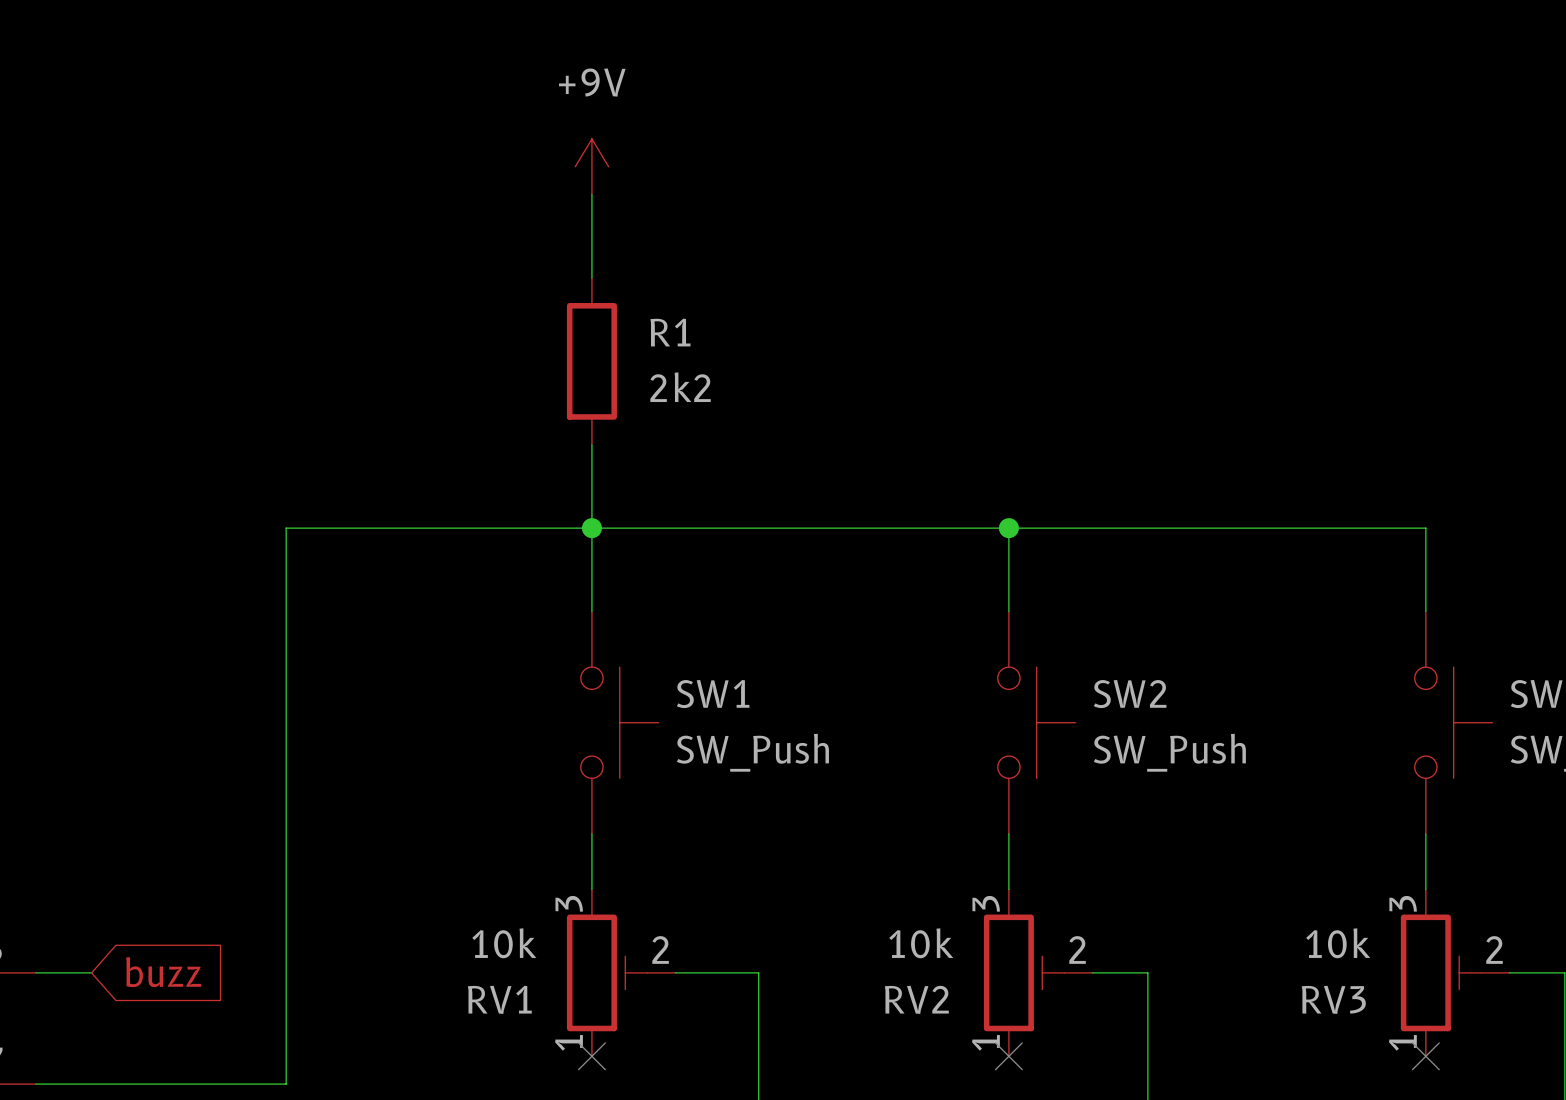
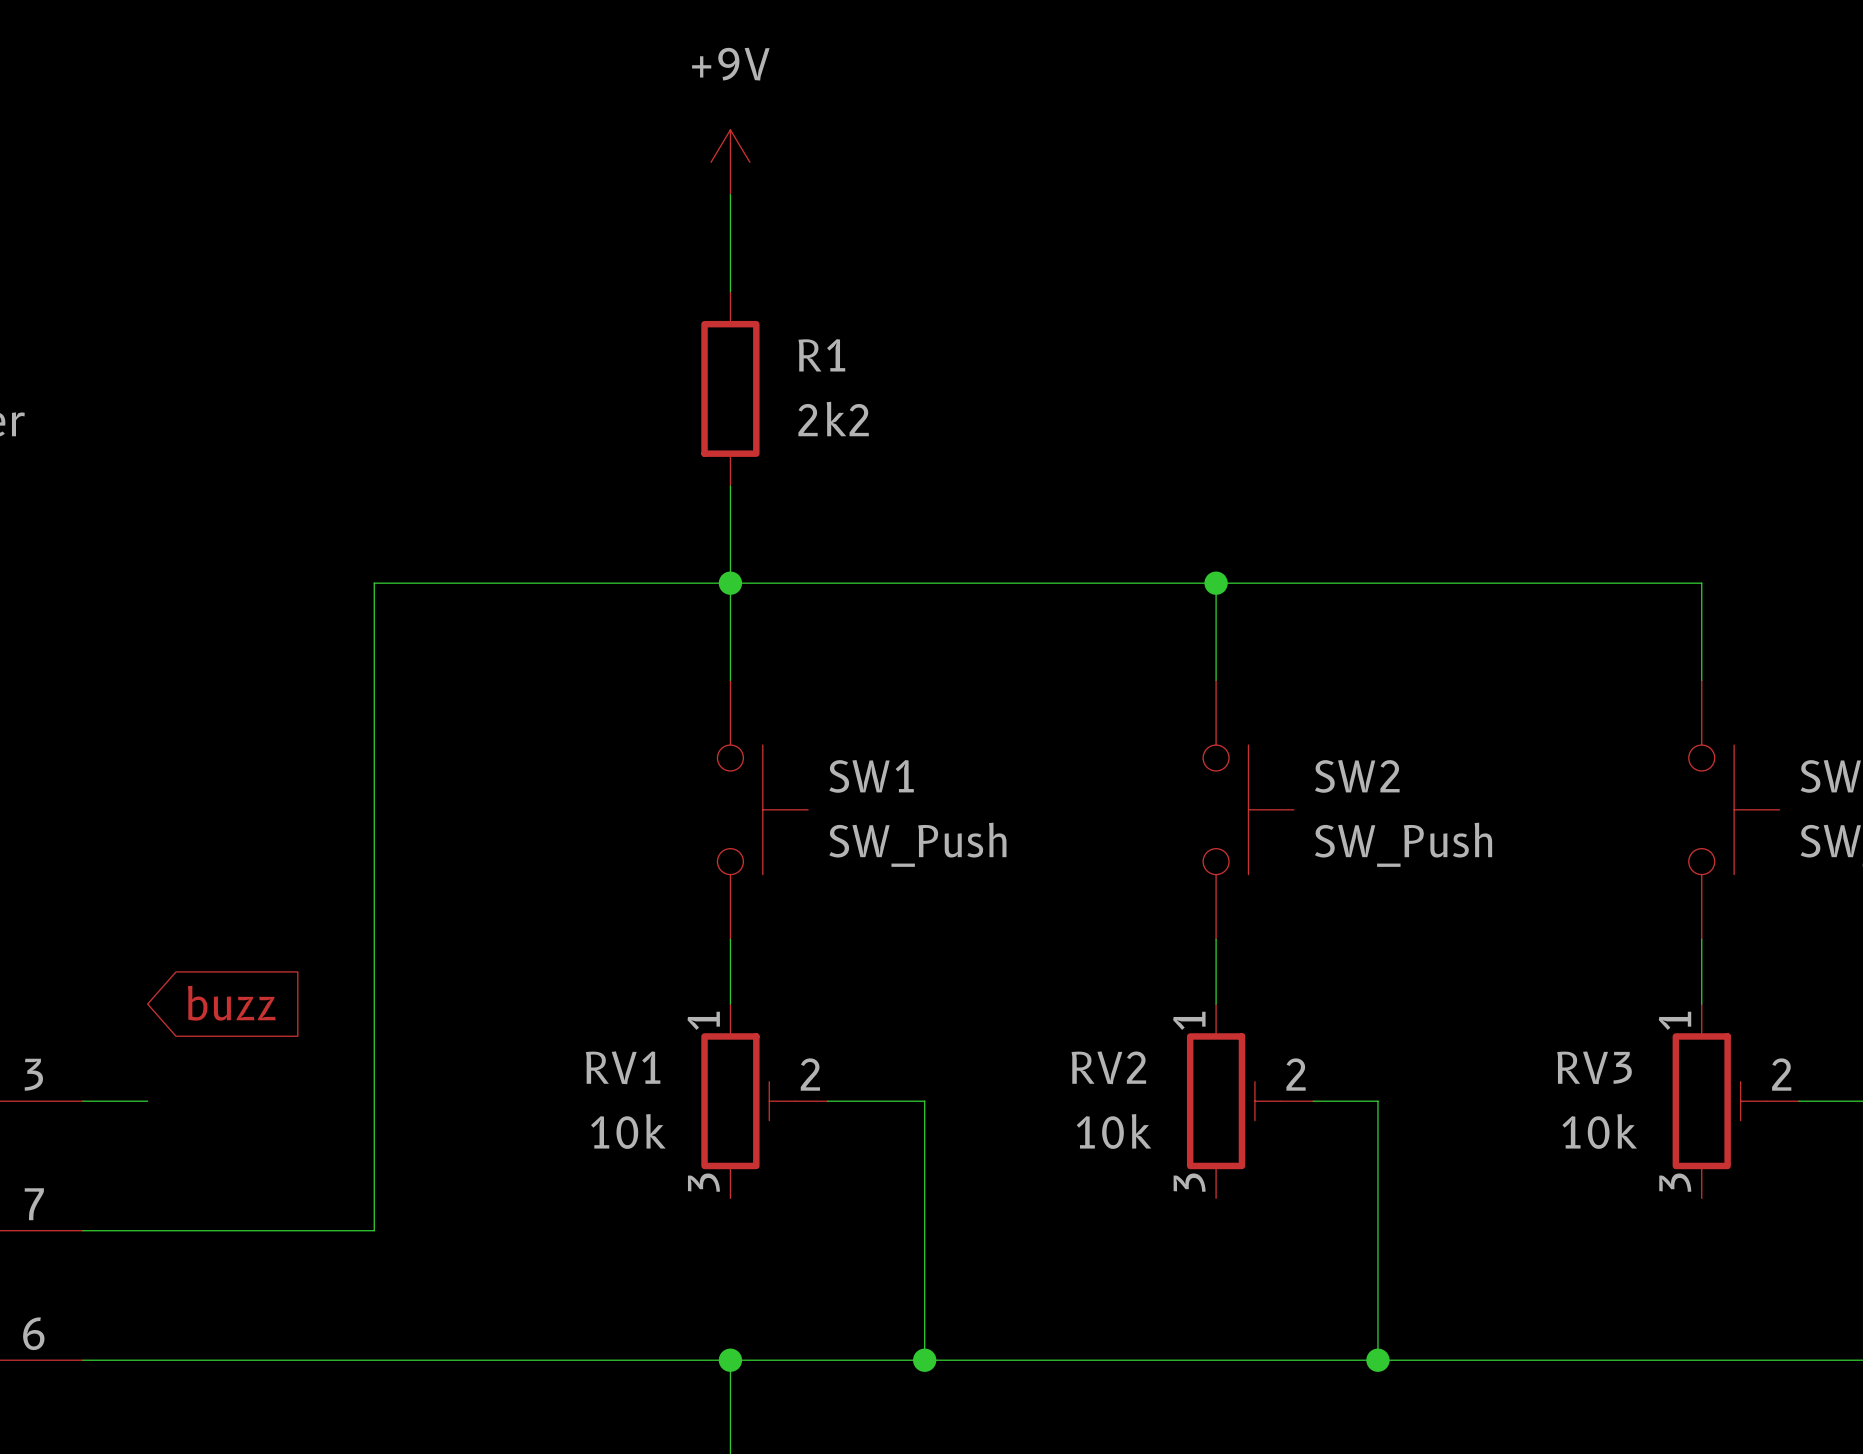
global label position: buzz (163, 972) -> buzz (231, 1003)
RV1 flip: as is (607, 972) -> up-down (748, 1101)
RV2 flip: as is (1024, 972) -> up-down (1233, 1101)
RV3 flip: as is (1441, 972) -> up-down (1719, 1101)
no-connect mark: (591, 1056) -> none
no-connect mark: (1008, 1056) -> none
no-connect mark: (1425, 1056) -> none

